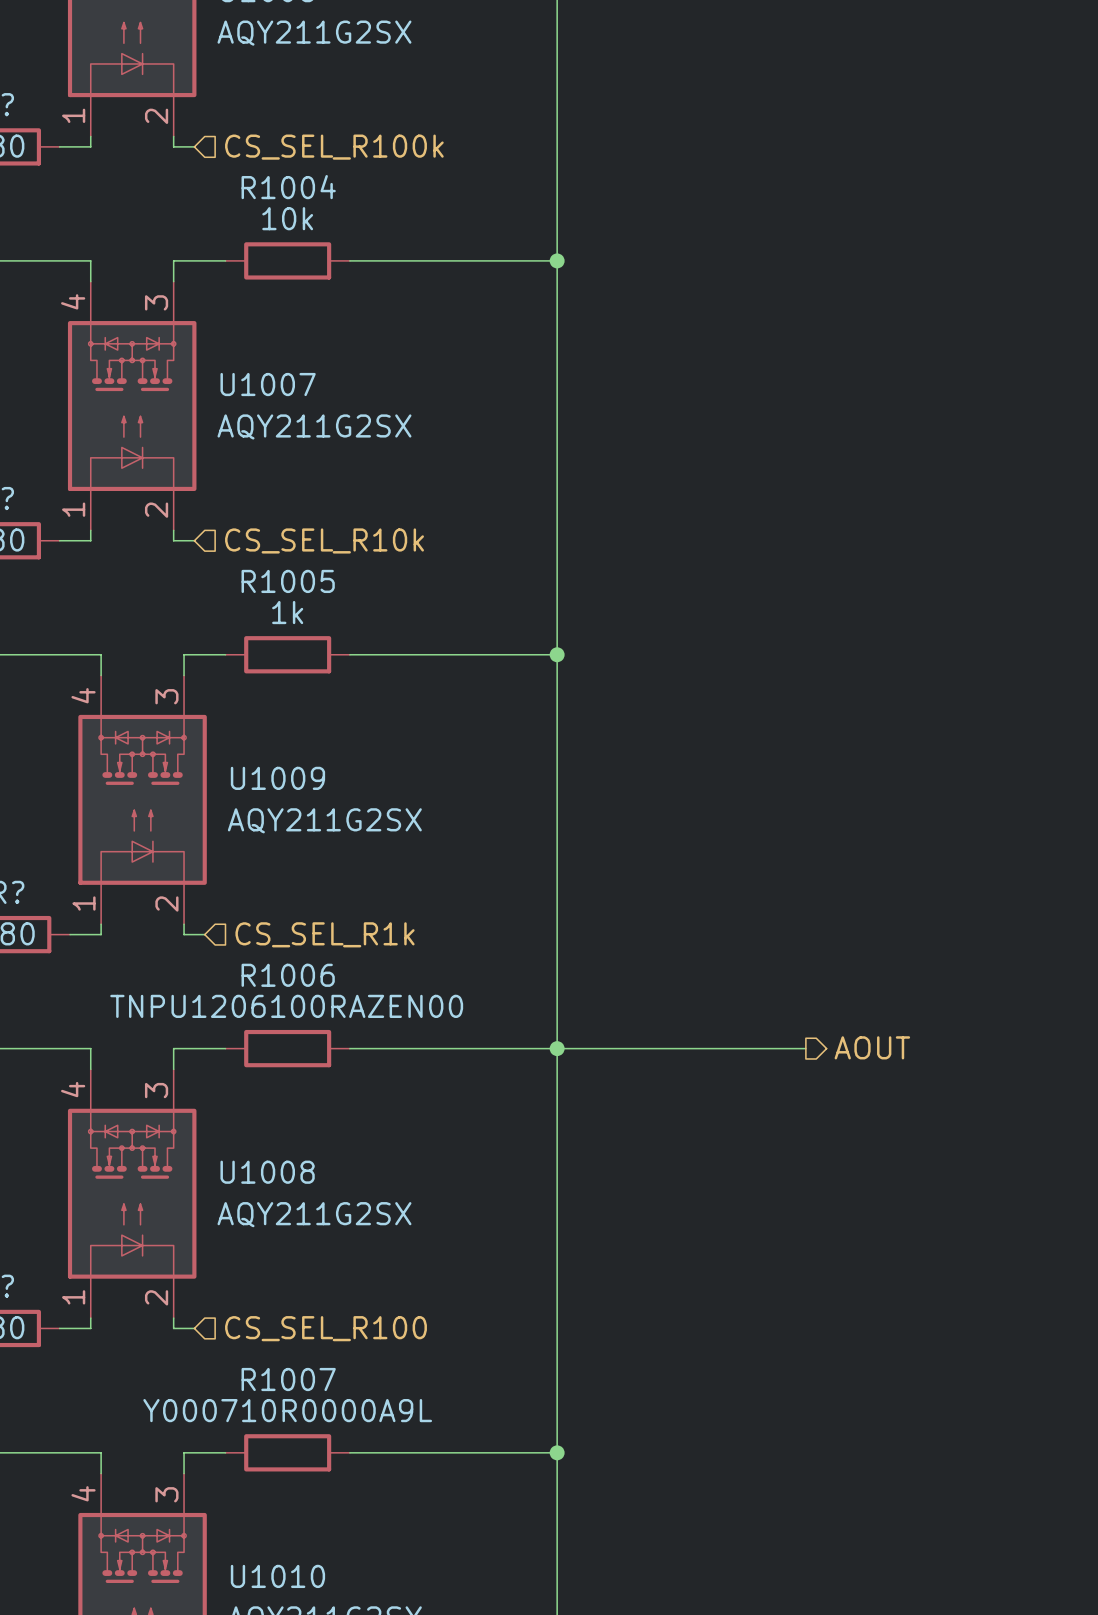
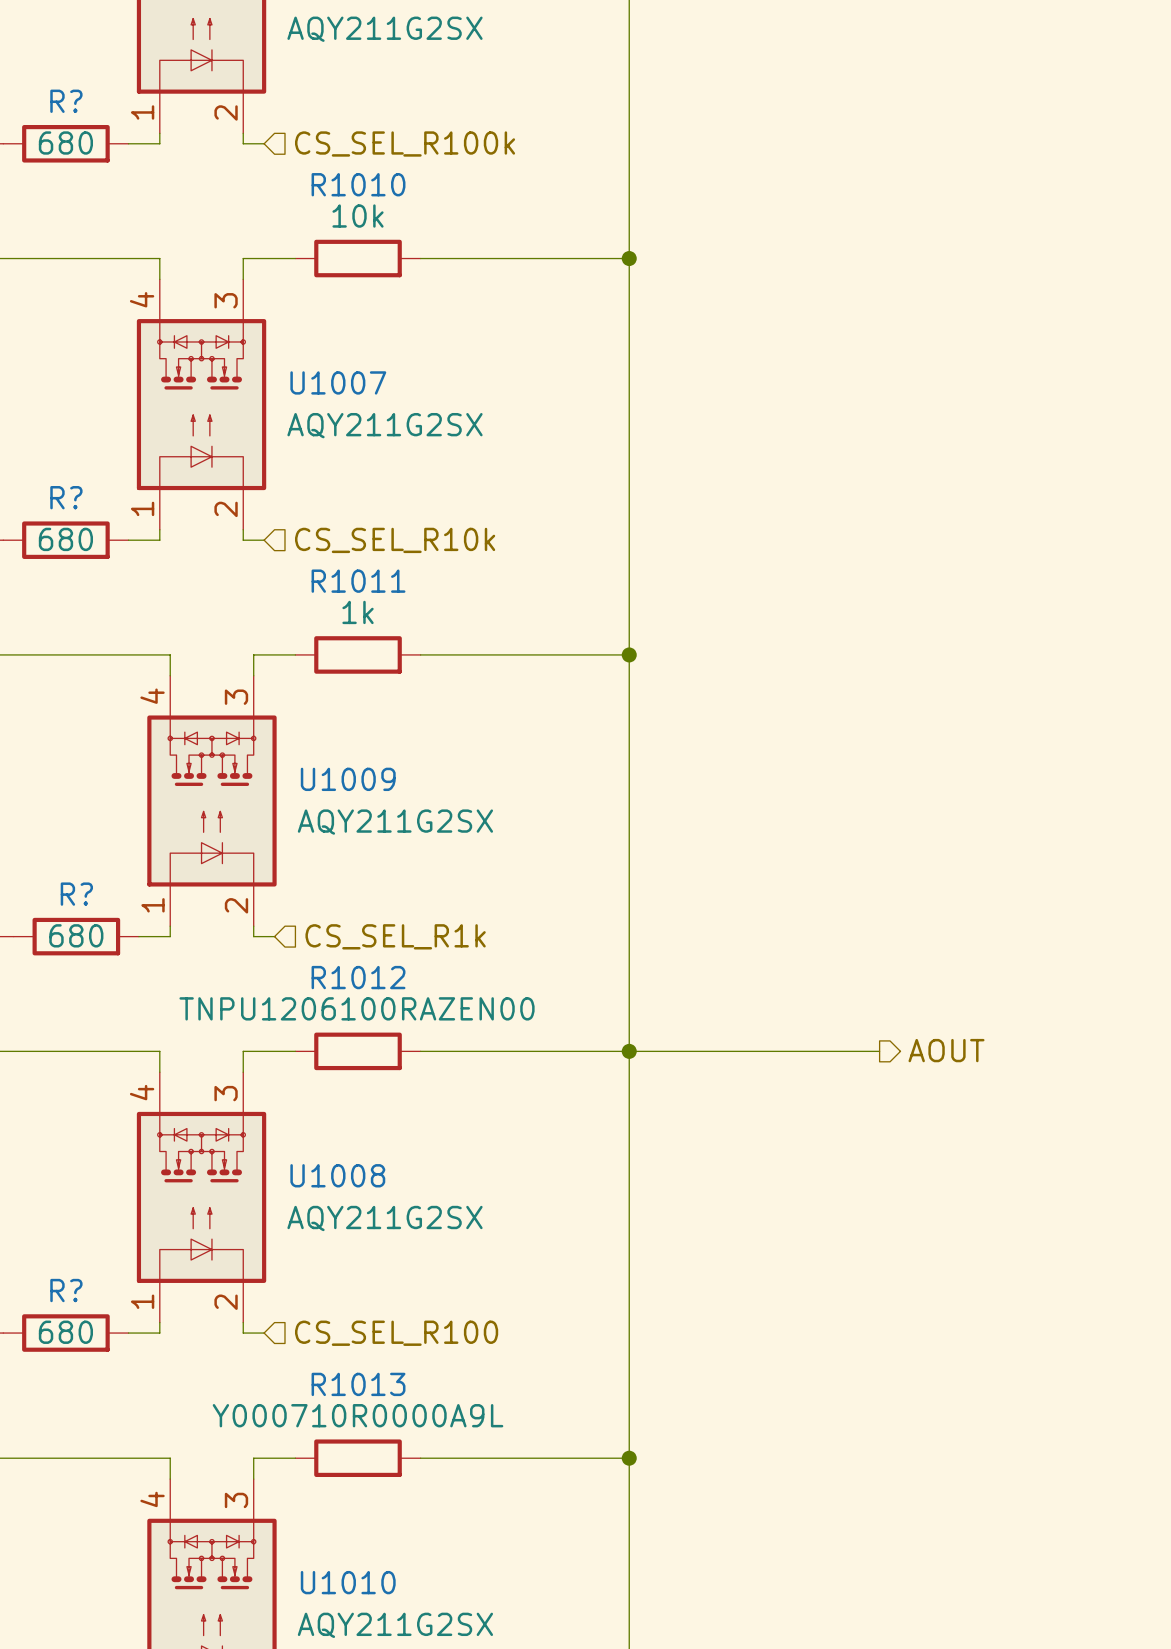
R1004 name: R1004 (288, 187) -> R1010 (358, 184)
R1005 name: R1005 (288, 581) -> R1011 (358, 581)
R1006 name: R1006 (288, 975) -> R1012 (358, 977)
R1007 name: R1007 (288, 1379) -> R1013 (358, 1384)

